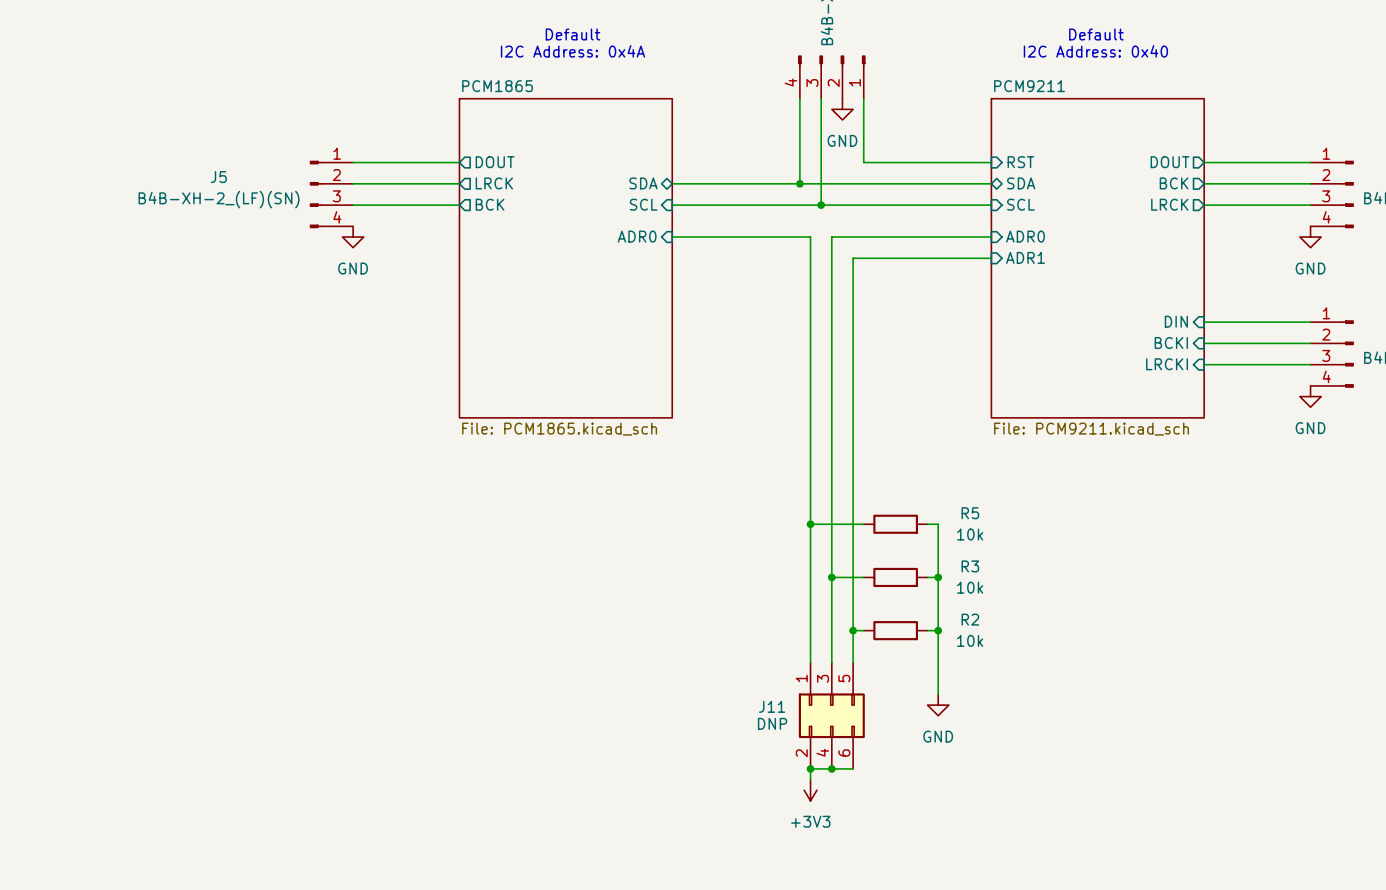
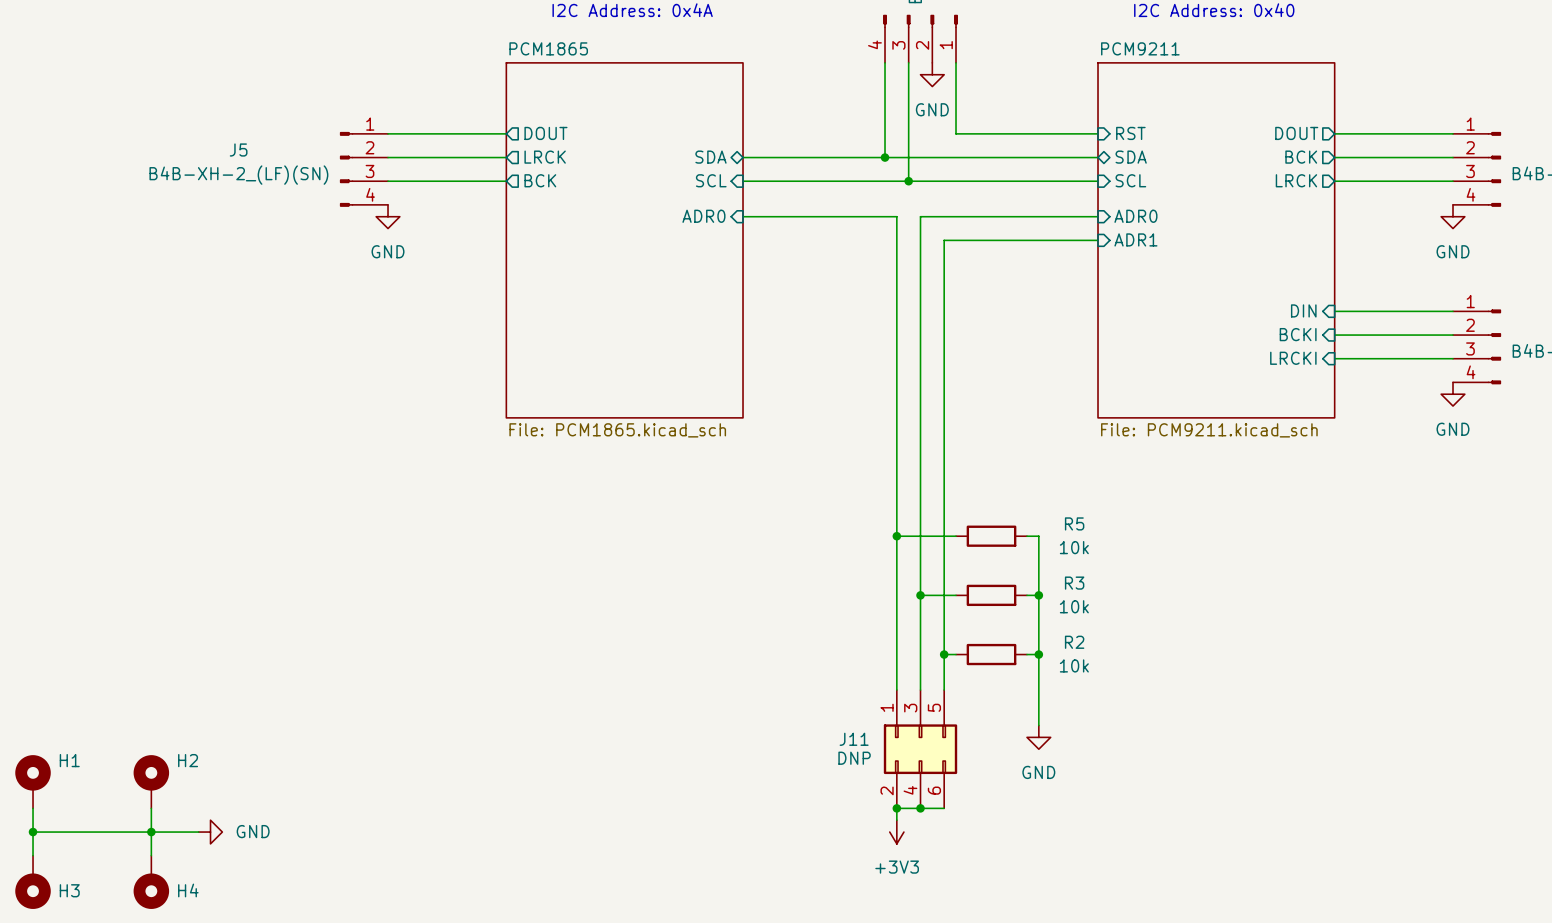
H1: none -> (33, 781)
H2: none -> (151, 781)
wire: none -> (33, 808) (33, 855)
wire: none -> (151, 808) (151, 855)
wire: none -> (33, 832) (198, 832)
junction: none -> (33, 832)
junction: none -> (151, 832)
power symbol: none -> GND (210, 832)
H3: none -> (33, 882)
H4: none -> (151, 882)

